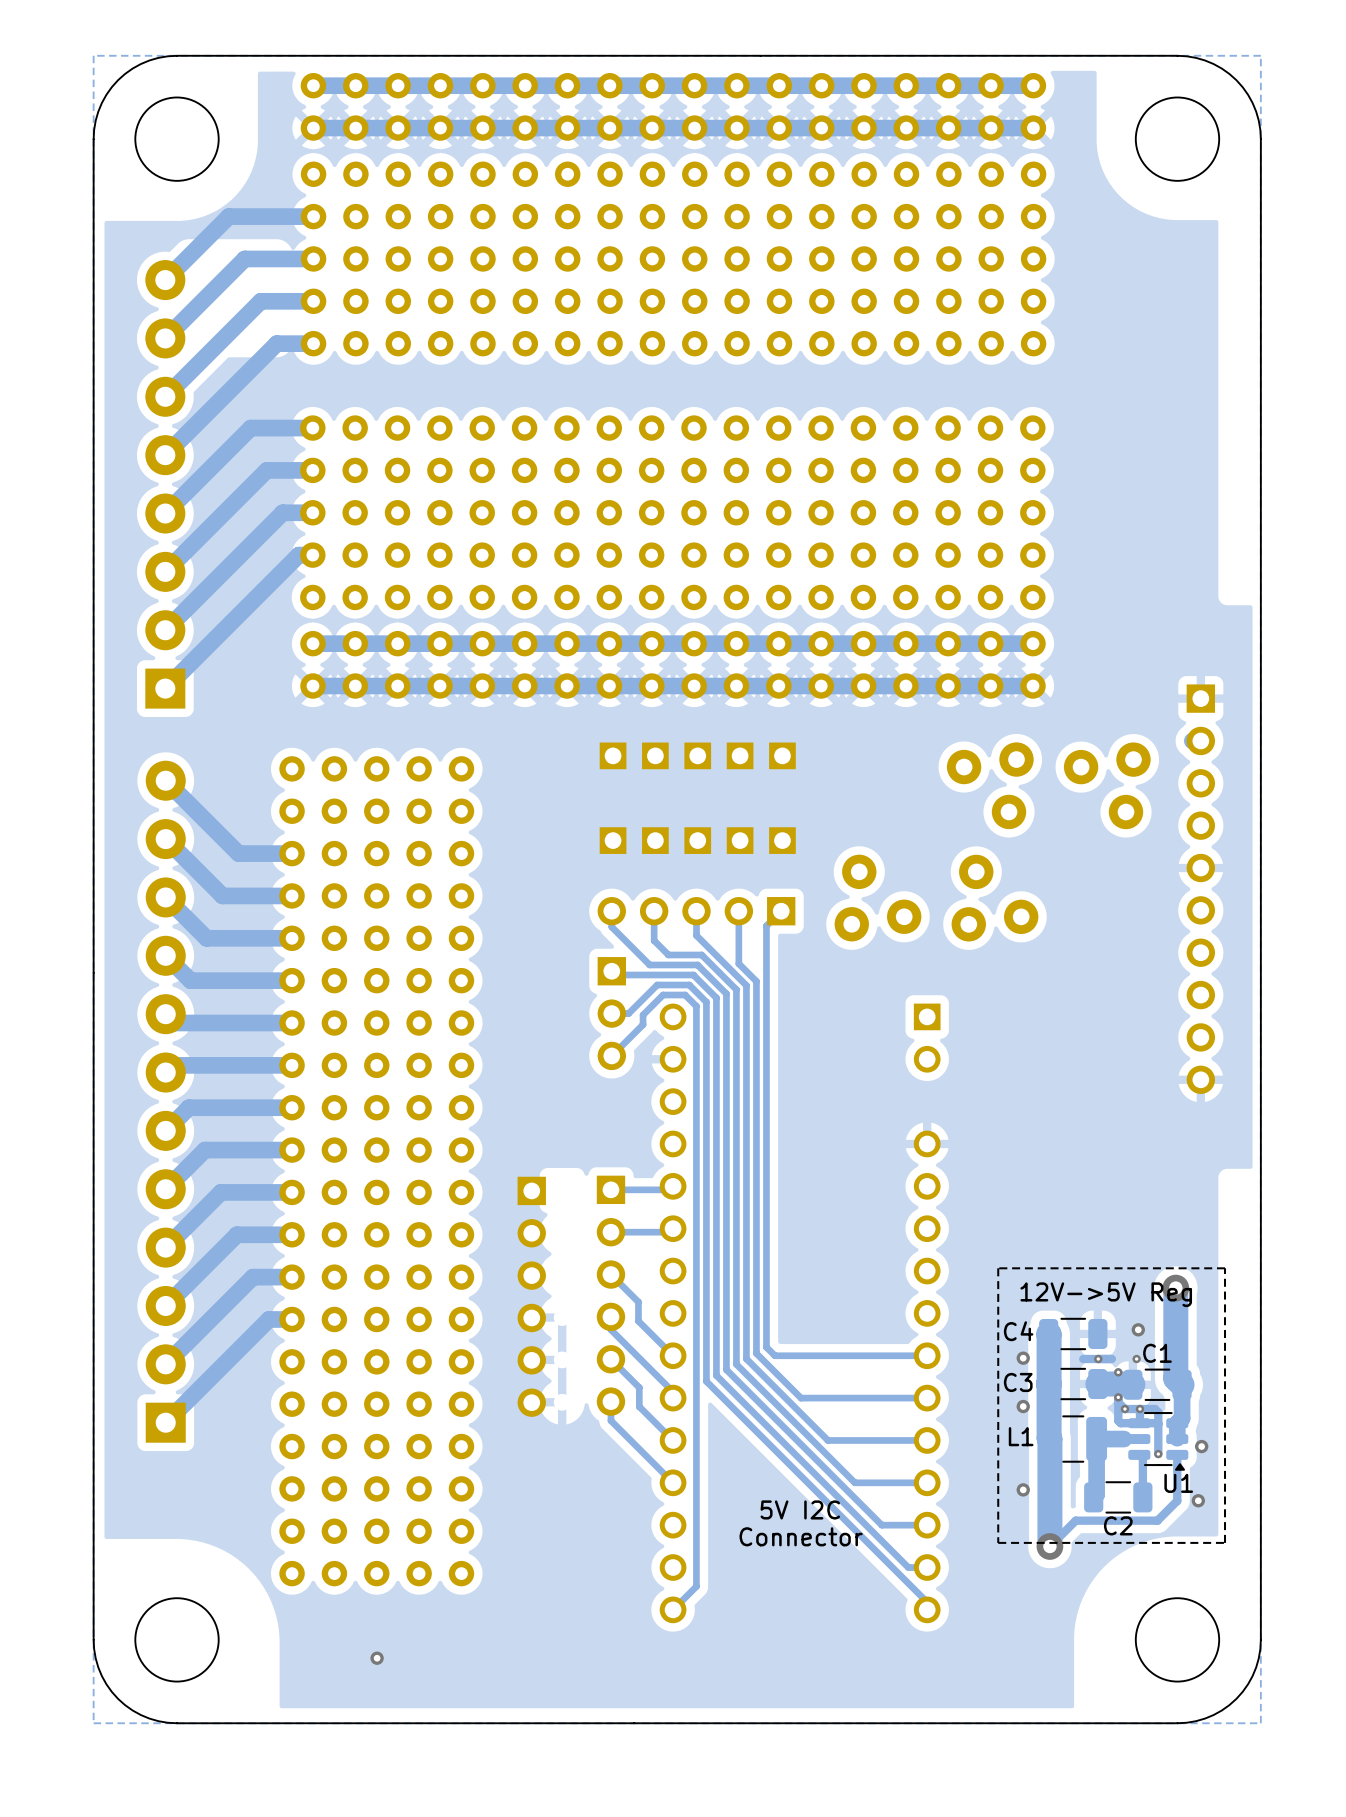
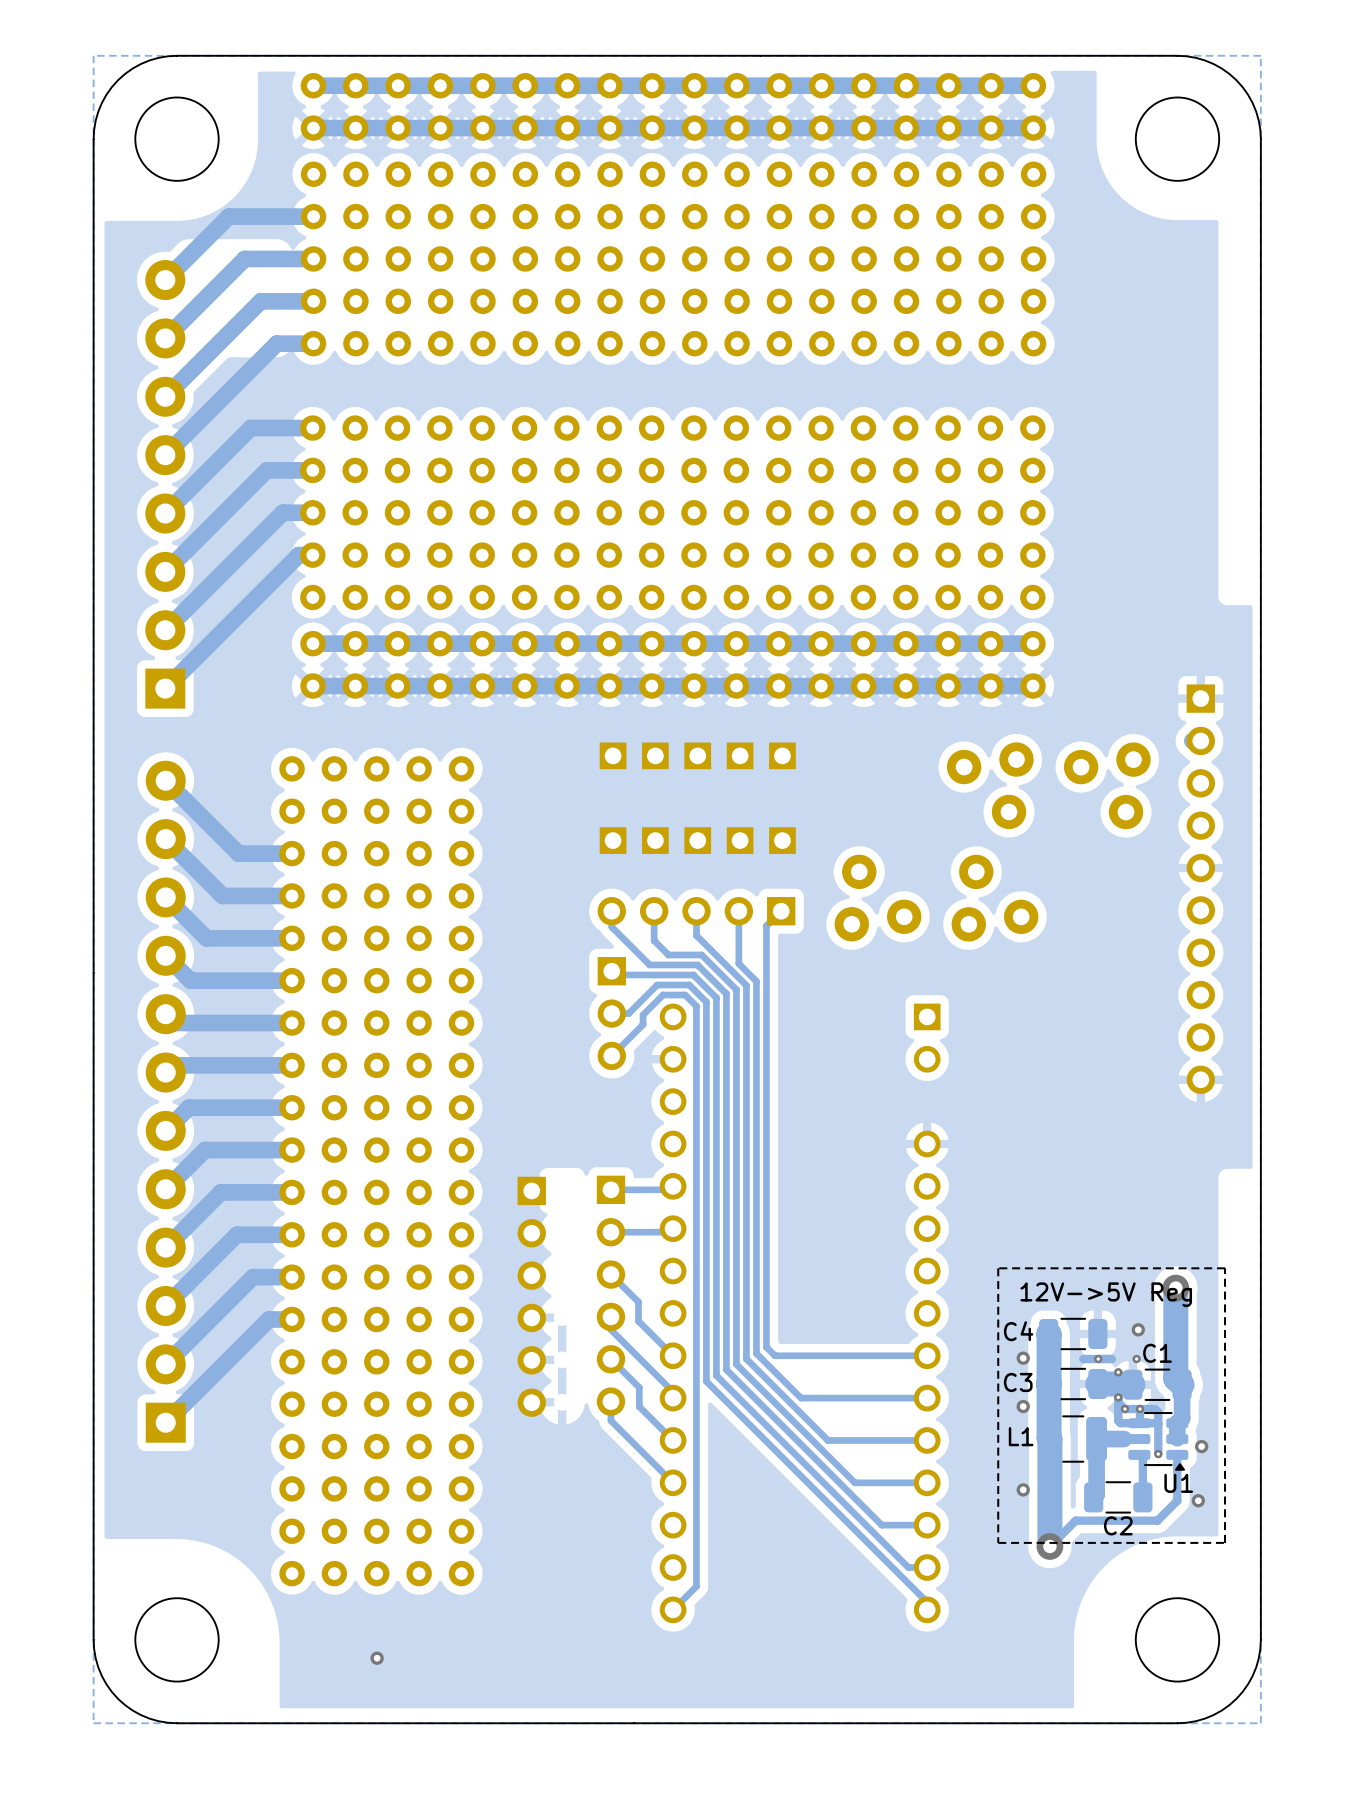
text: 5V I2C (800, 1509) -> none
text: Connector (801, 1536) -> none

